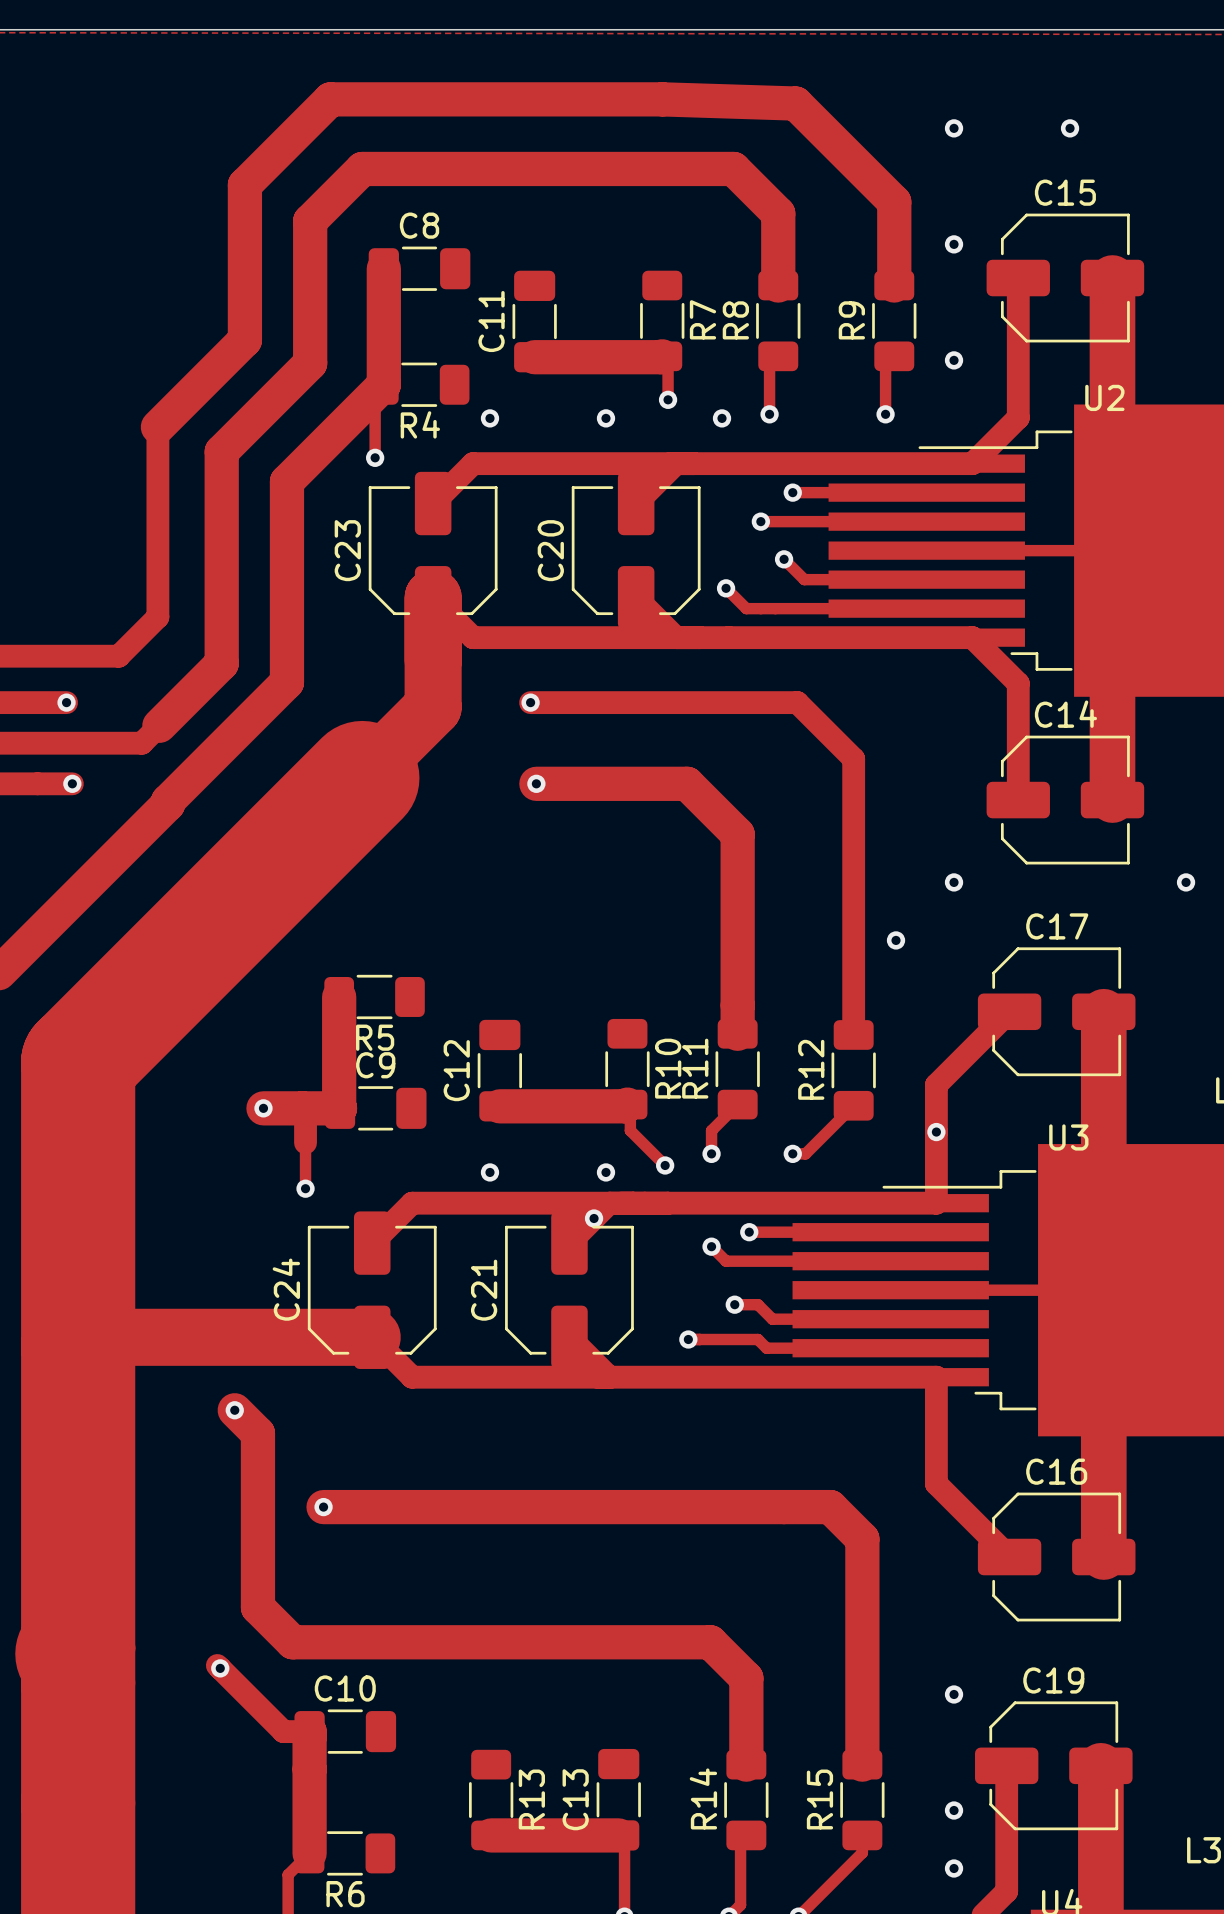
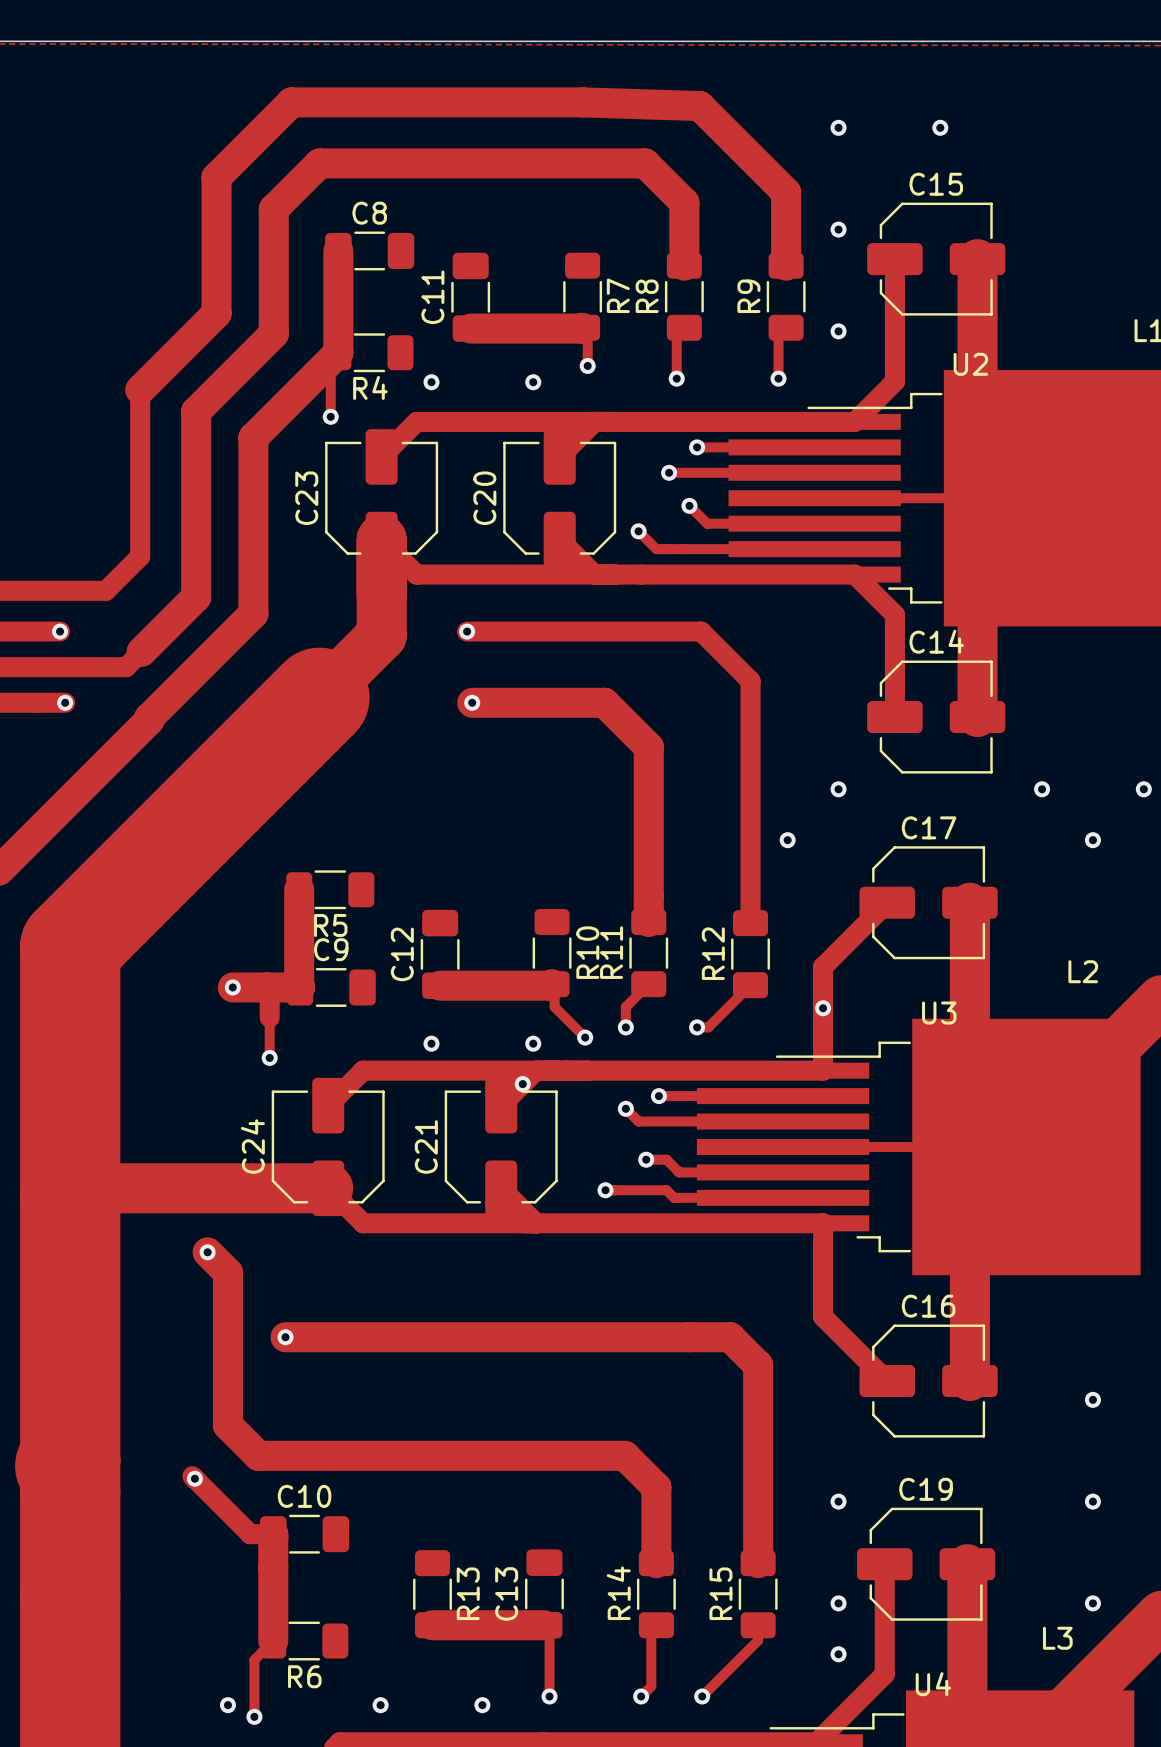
via: (722, 418) -> none

